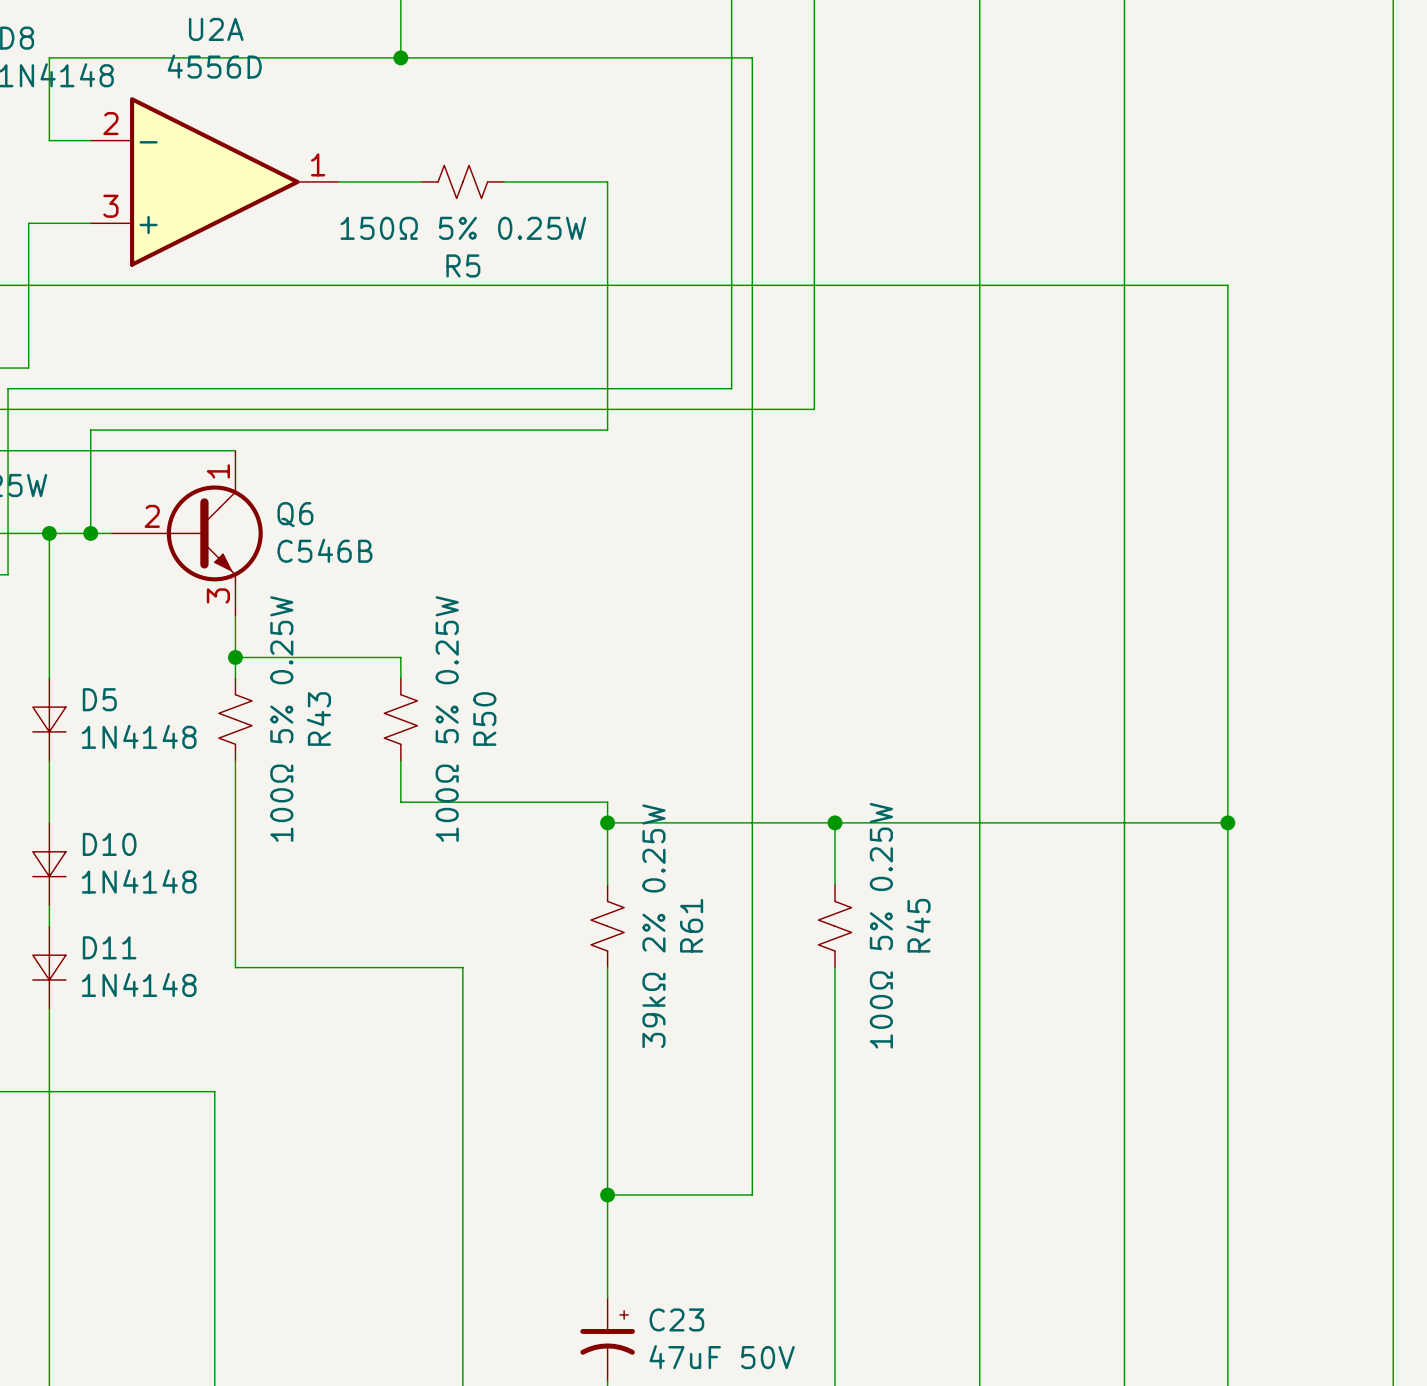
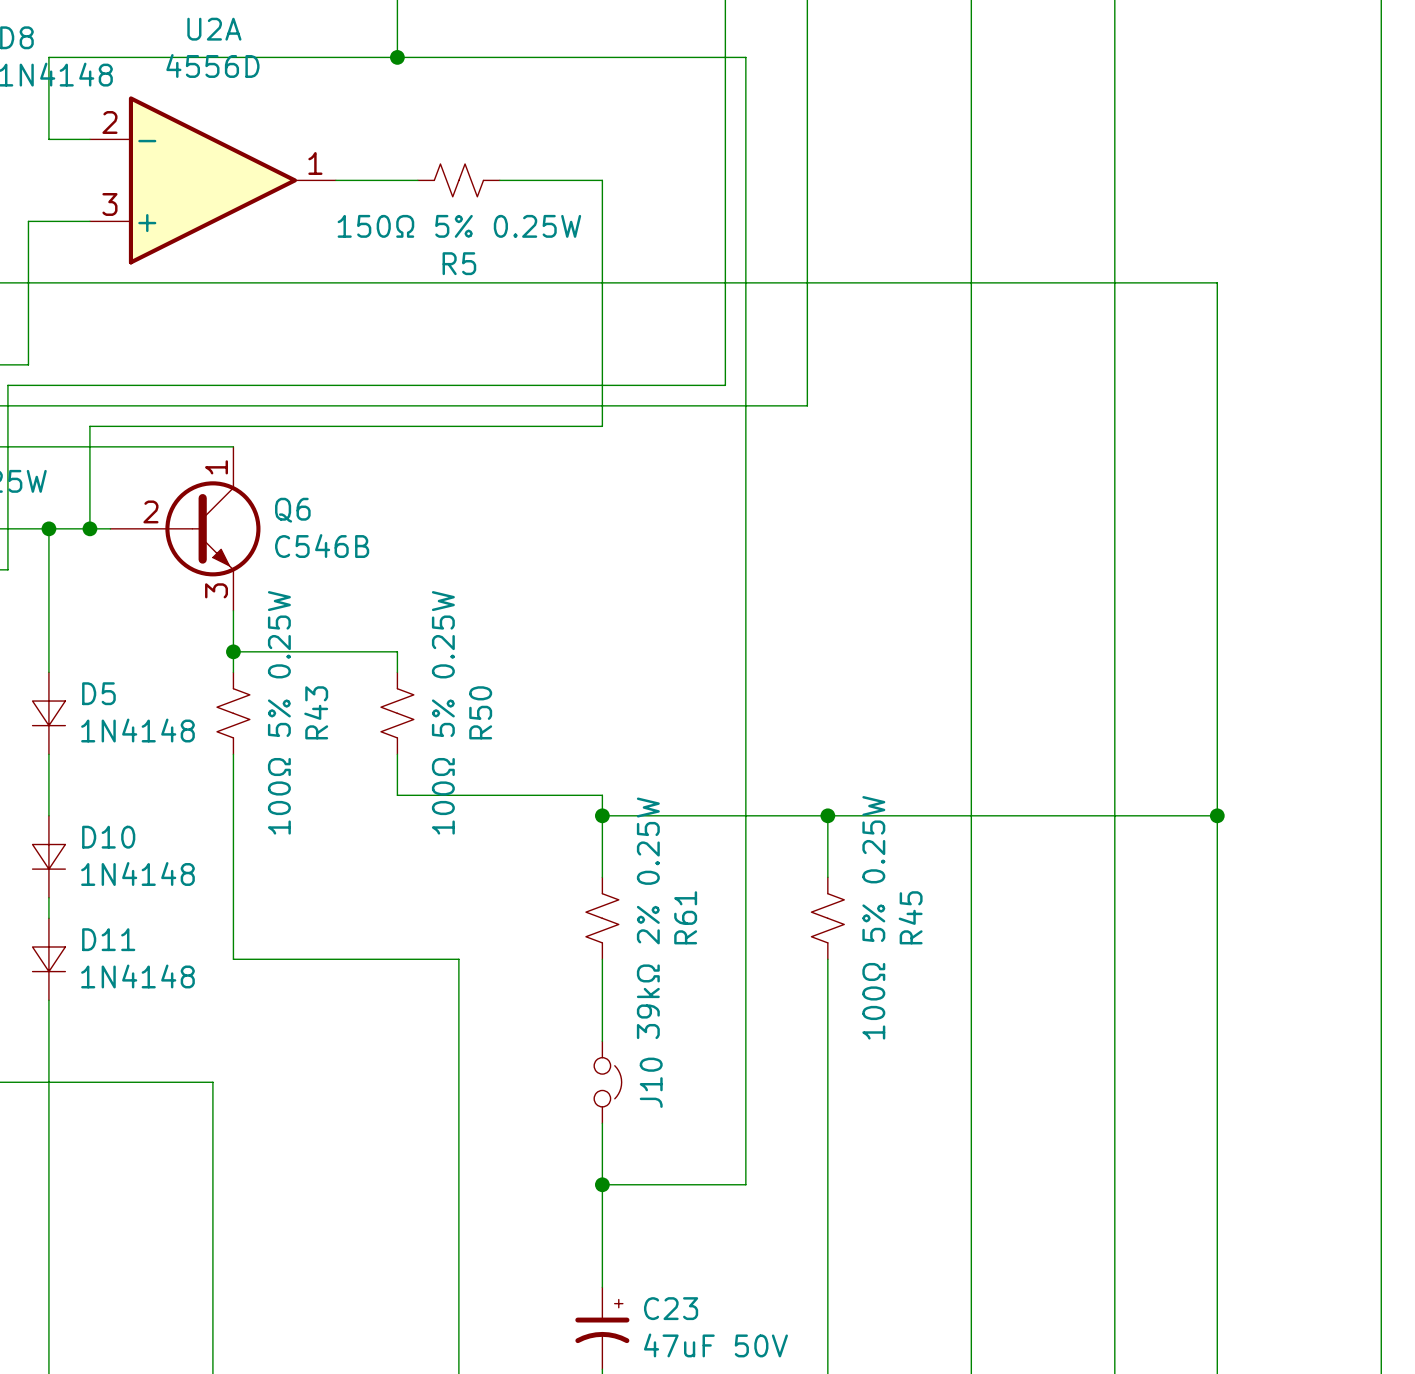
wire: (607, 1050) (607, 1133) -> none
J10: none -> (607, 1082)

